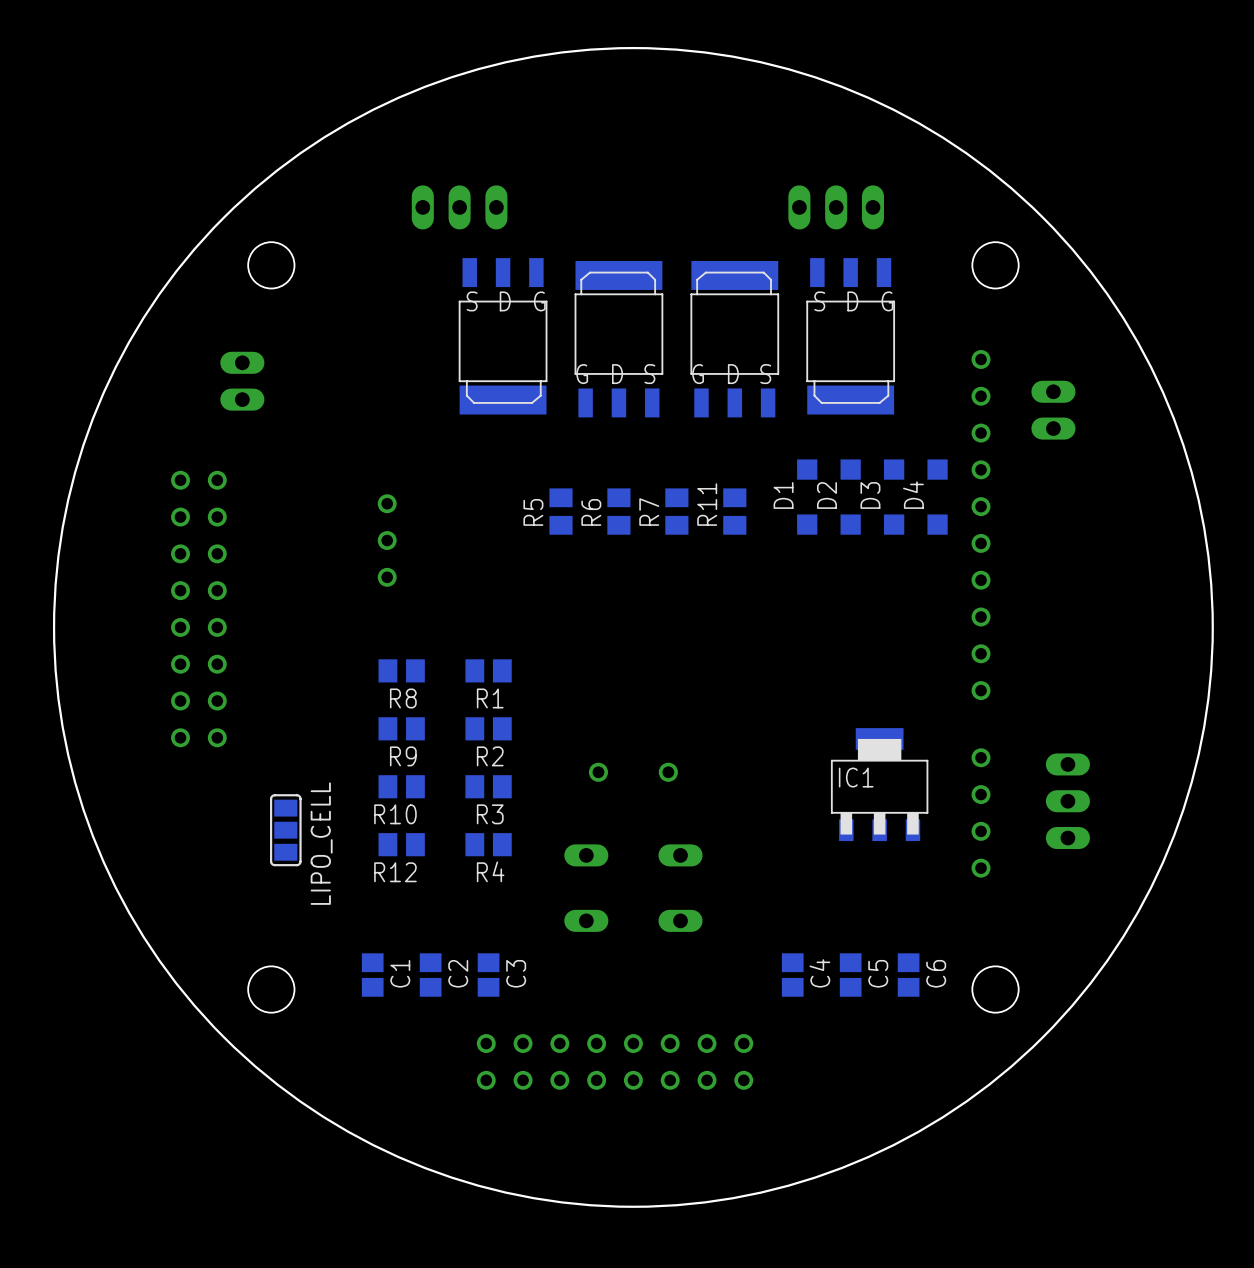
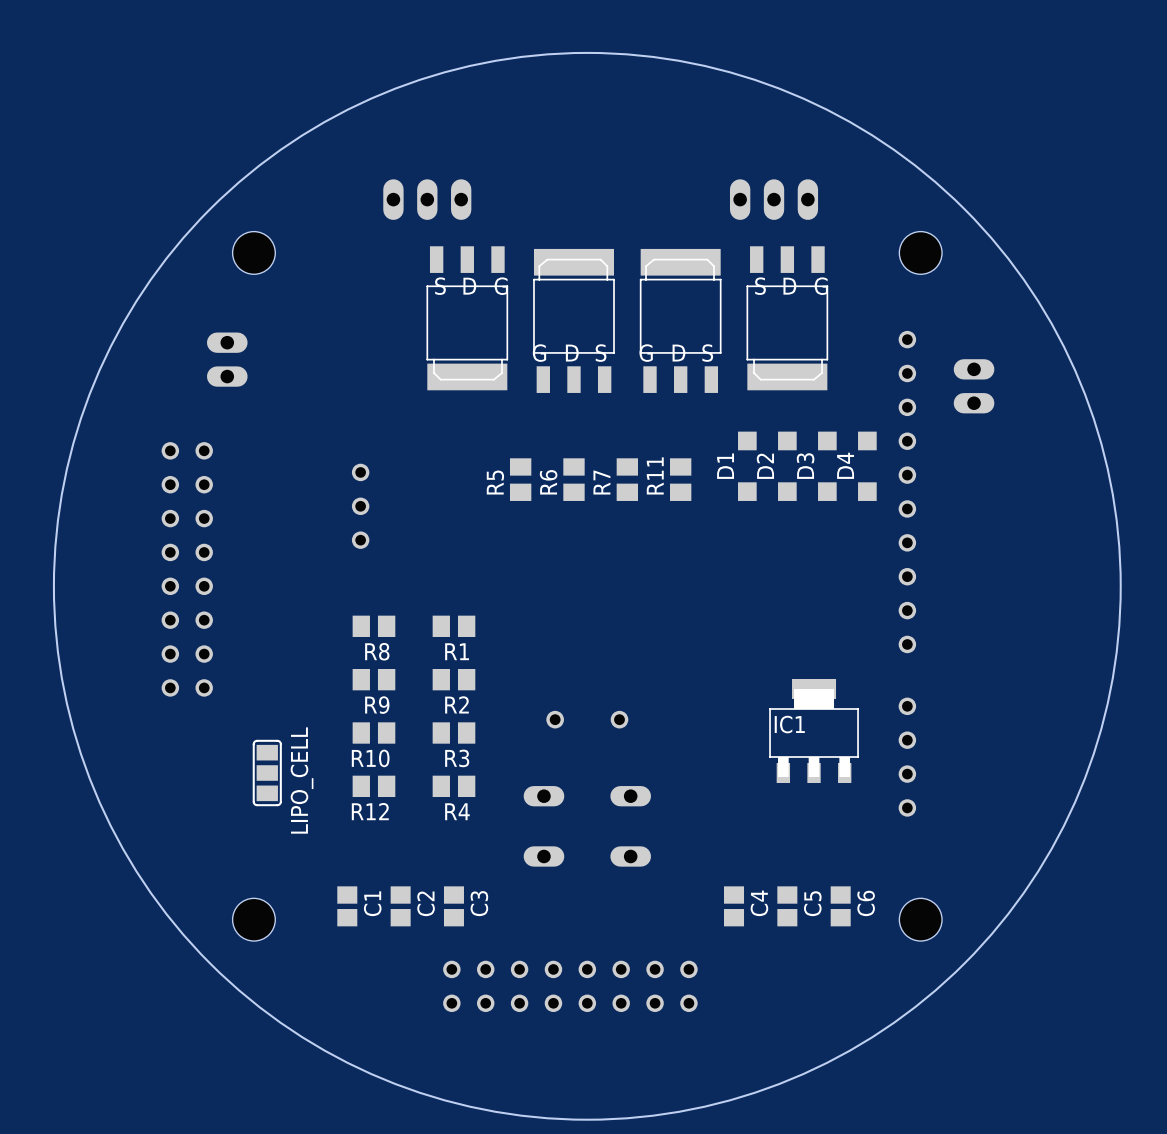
part: (1067, 801) -> none

